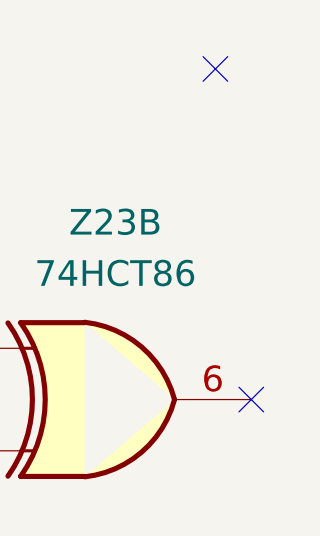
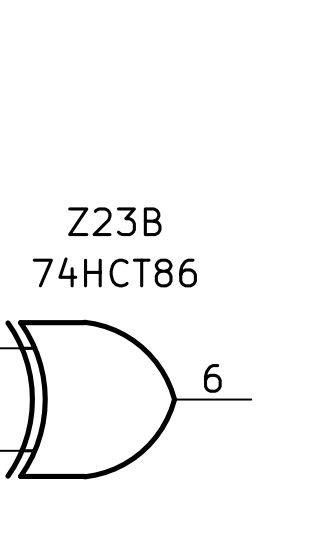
no-connect mark: (215, 68) -> none
no-connect mark: (251, 399) -> none

